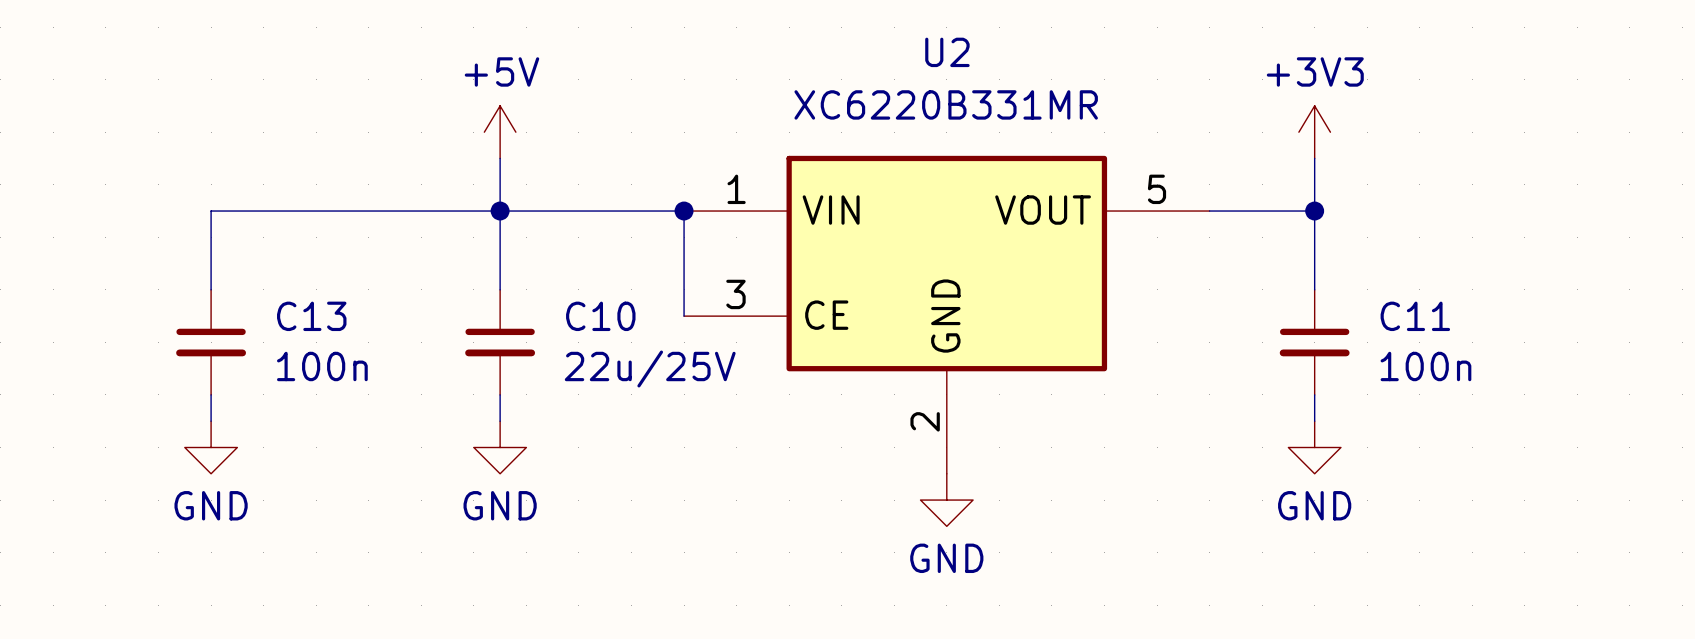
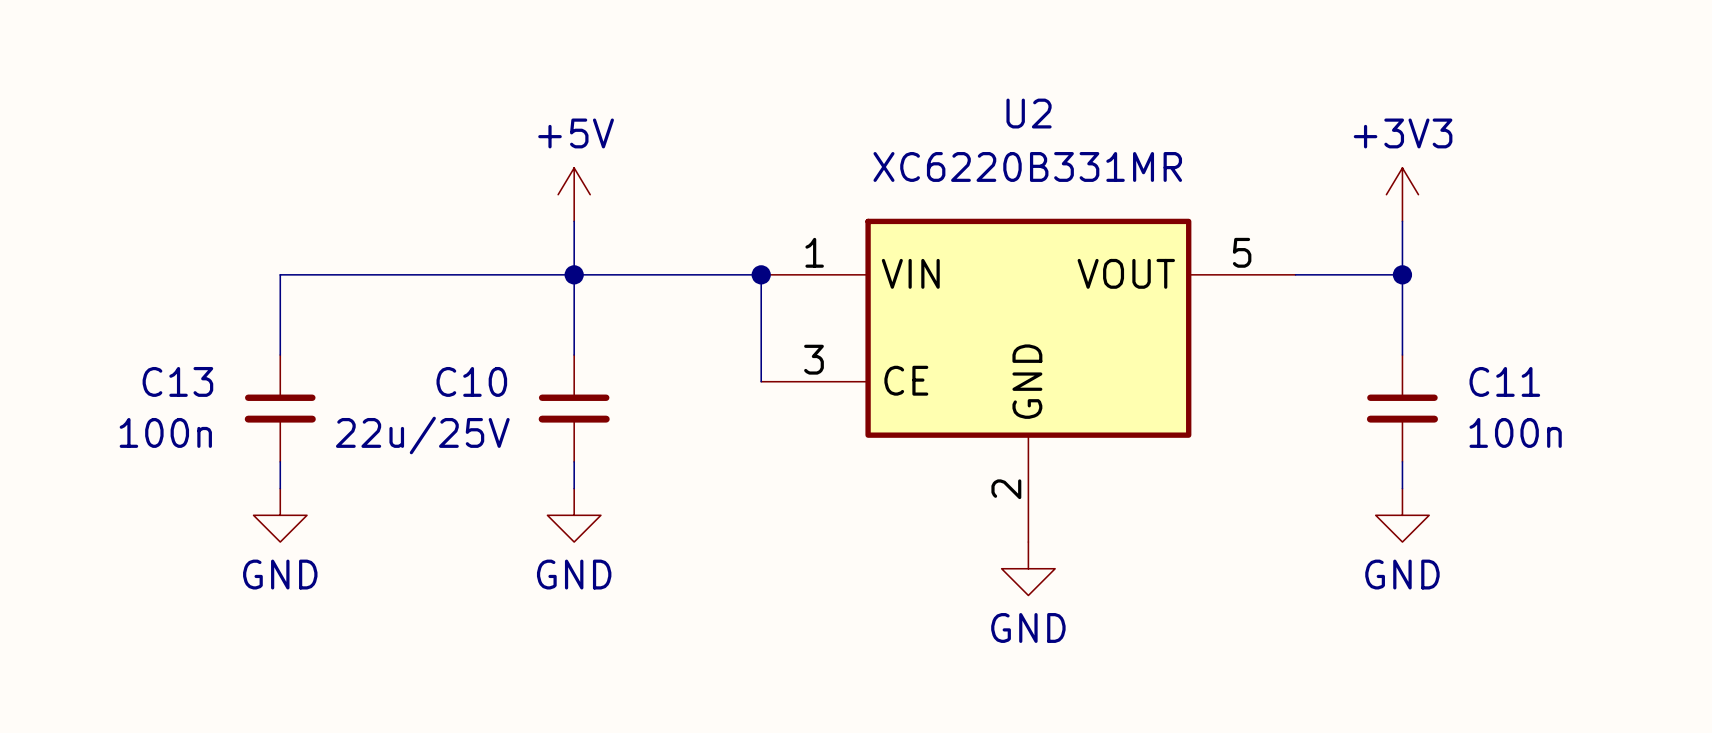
C13 name position: C13 (311, 316) -> C13 (177, 381)
C10 name position: C10 (600, 316) -> C10 (471, 381)
C13 value position: 100n (322, 366) -> 100n (165, 432)
C10 value position: 22u/25V (650, 368) -> 22u/25V (422, 435)

